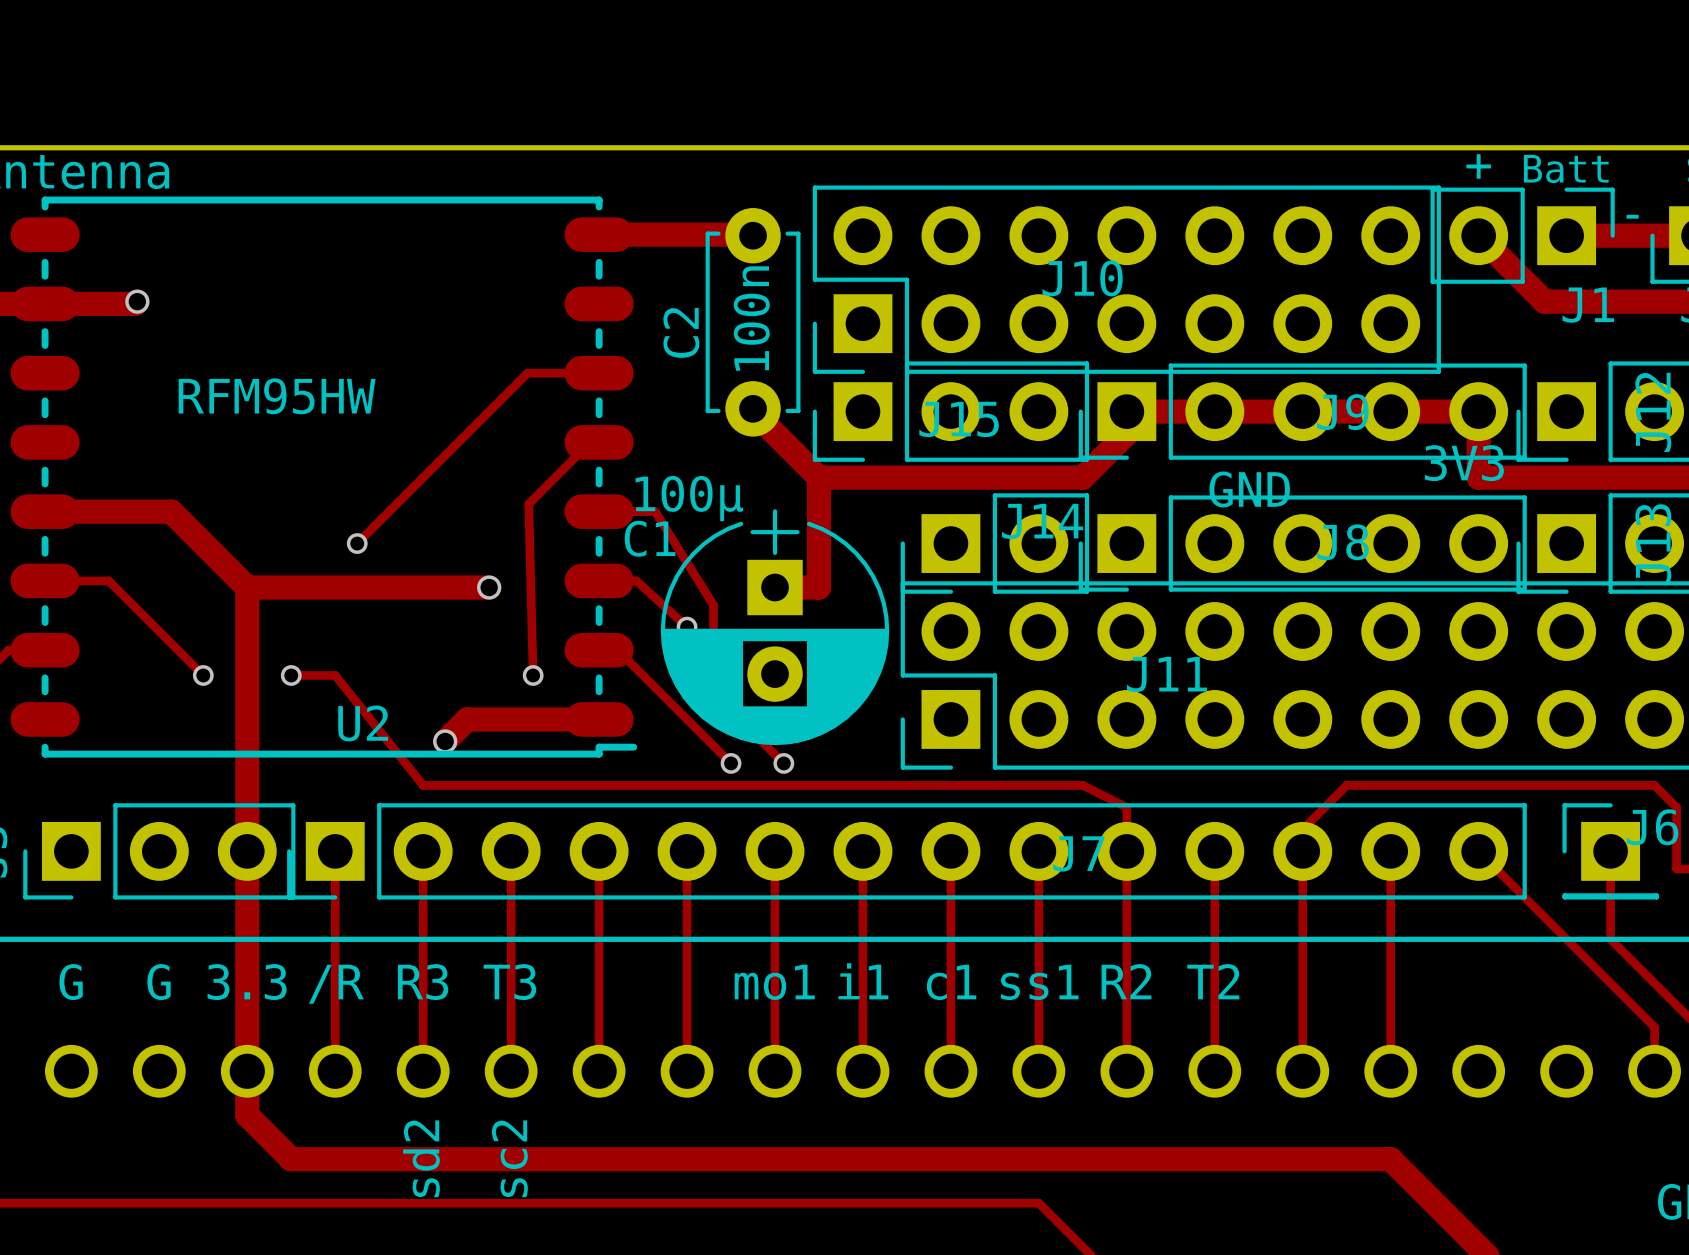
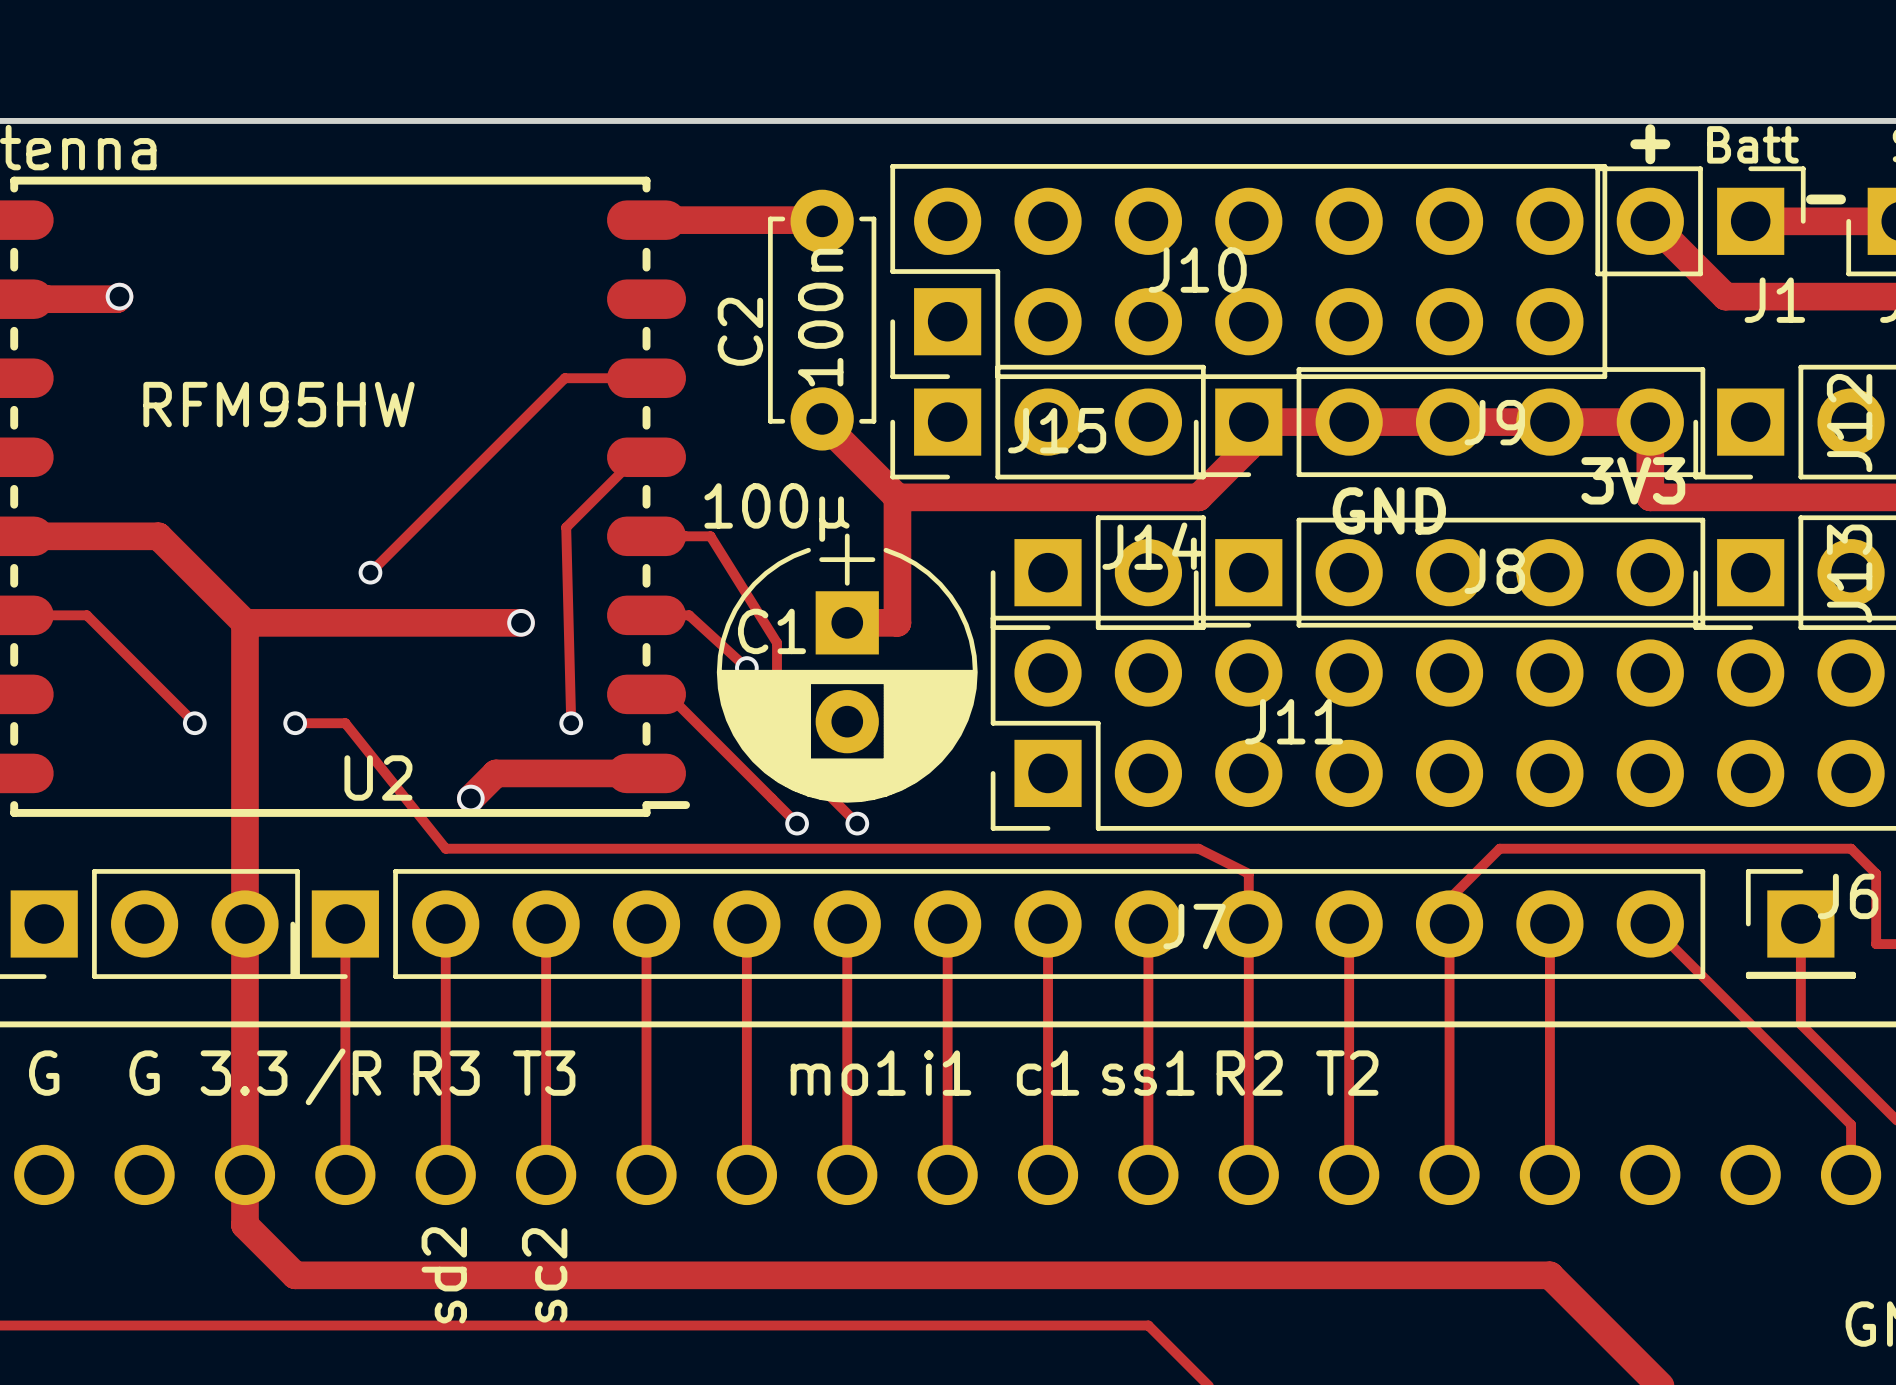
C1 value position: 100µ (689, 498) -> 100µ (777, 512)
C1 name position: C1 (650, 538) -> C1 (771, 631)

